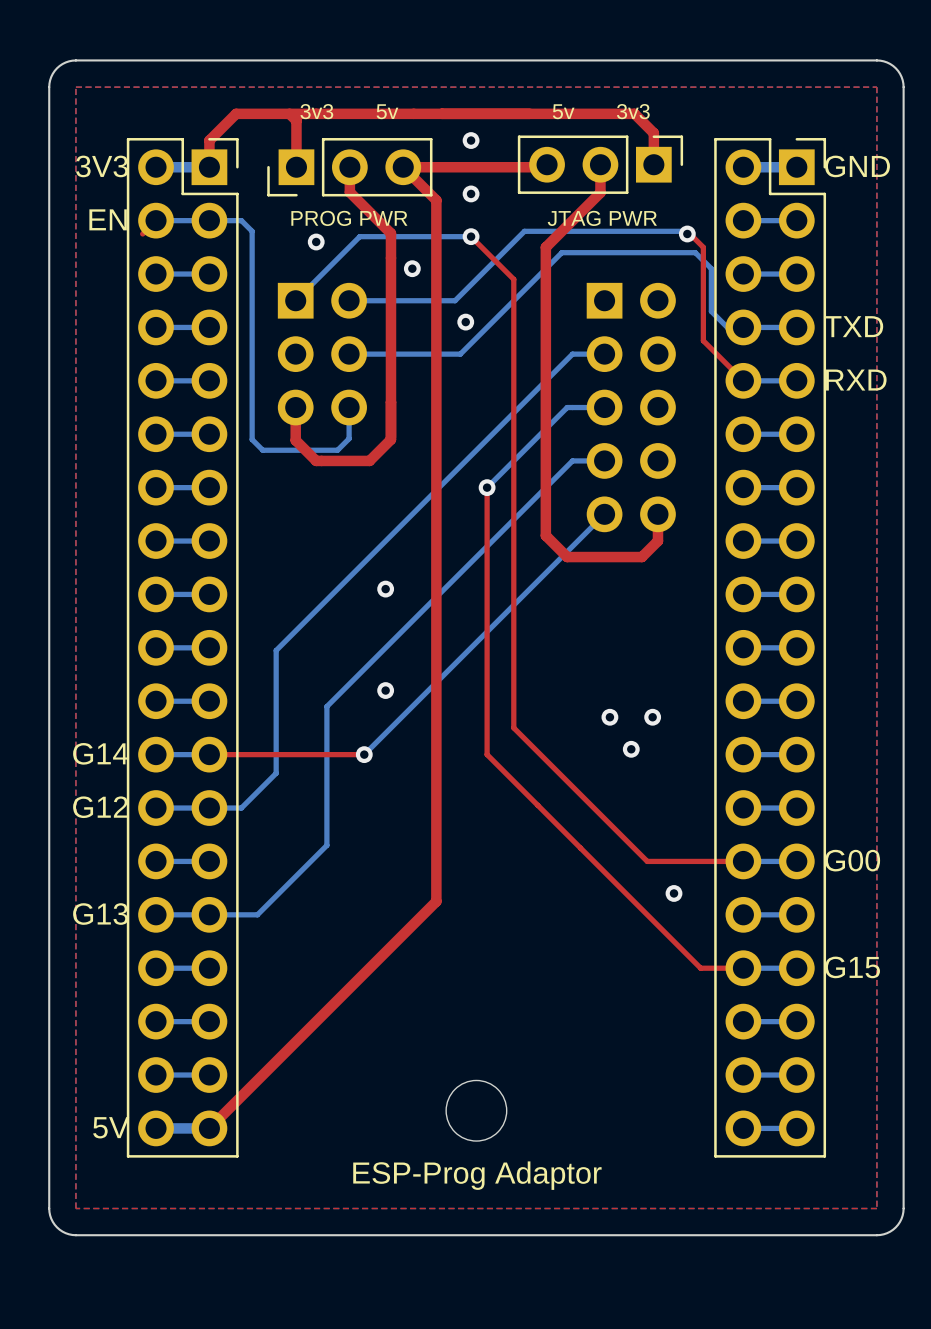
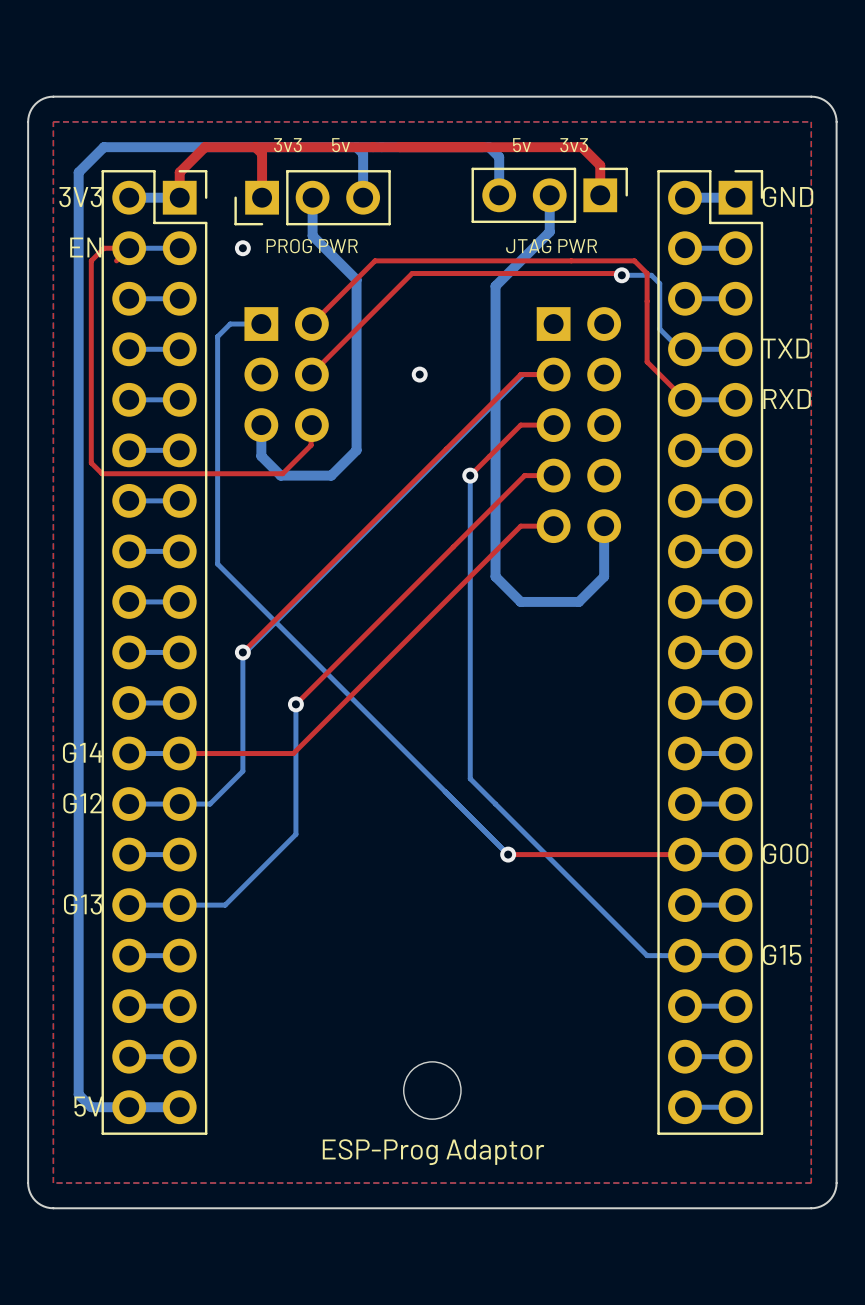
bottom track: none -> (356, 147) (363, 153) (363, 197)
via: (471, 140) -> none
bottom track: none -> (499, 195) (499, 157) (489, 147) (103, 147) (78, 172) (78, 1094) (91, 1107) (129, 1107)
top track: (547, 164) (544, 167) (403, 167) (436, 200) (436, 901) (209, 1128) -> none
bottom track: none -> (549, 195) (549, 231) (495, 286) (495, 576) (520, 601) (578, 601) (604, 576) (604, 526)
top track: (600, 164) (600, 192) (545, 247) (545, 535) (567, 557) (641, 557) (657, 541) (657, 514) -> none
bottom track: none -> (312, 197) (312, 235) (356, 279) (356, 450) (331, 475) (280, 475) (261, 456) (261, 425)
top track: (349, 167) (349, 192) (390, 233) (390, 439) (369, 460) (316, 460) (295, 440) (295, 407) -> none
via: (471, 193) -> none
top track: none -> (129, 248) (103, 248) (91, 260) (91, 462) (102, 473) (282, 473) (311, 445) (311, 425)
bottom track: (222, 220) (241, 220) (252, 231) (252, 439) (262, 450) (337, 450) (349, 438) (349, 407) -> none
bottom track: (687, 233) (684, 231) (524, 231) (455, 300) (349, 300) -> none
top track: none -> (631, 260) (375, 260) (311, 324)
via position: (687, 233) -> (621, 275)
bottom track: (471, 236) (359, 236) (295, 300) -> (508, 854) (217, 564) (217, 336) (230, 324) (261, 324)
top track: (471, 236) (513, 279) (513, 727) (647, 861) -> (508, 854) (594, 854)
via: (471, 236) -> none
via position: (316, 242) -> (242, 248)
top track: none -> (621, 275) (620, 273) (412, 273) (311, 374)
via: (412, 268) -> none
via position: (465, 322) -> (419, 374)
bottom track: (743, 327) (727, 327) (711, 311) (711, 268) (695, 252) (561, 252) (460, 354) (349, 354) -> (685, 349) (685, 354) (659, 329) (659, 283) (651, 275) (621, 275)
top track: none -> (553, 374) (520, 374) (242, 652)
bottom track: (604, 407) (567, 407) (487, 487) -> none
top track: none -> (553, 425) (520, 425) (470, 475)
bottom track: none -> (470, 475) (470, 778) (647, 955) (685, 955)
bottom track: (604, 460) (572, 460) (326, 706) (326, 845) -> (295, 704) (295, 834) (290, 839)
top track: none -> (553, 475) (524, 475) (295, 704)
top track: (487, 487) (487, 754) (700, 968) (743, 968) -> none
via position: (487, 487) -> (470, 475)
bottom track: (604, 514) (364, 754) (358, 754) -> none
via: (385, 589) -> none
via: none -> (242, 652)
via: (385, 690) -> none
via: none -> (295, 704)
via: (609, 717) -> none
via: (652, 717) -> none
via: (631, 749) -> none
top track: (329, 754) (364, 754) -> (293, 753) (520, 526) (553, 526)
via: (364, 754) -> none
via: none -> (508, 854)
via: (674, 893) -> none

